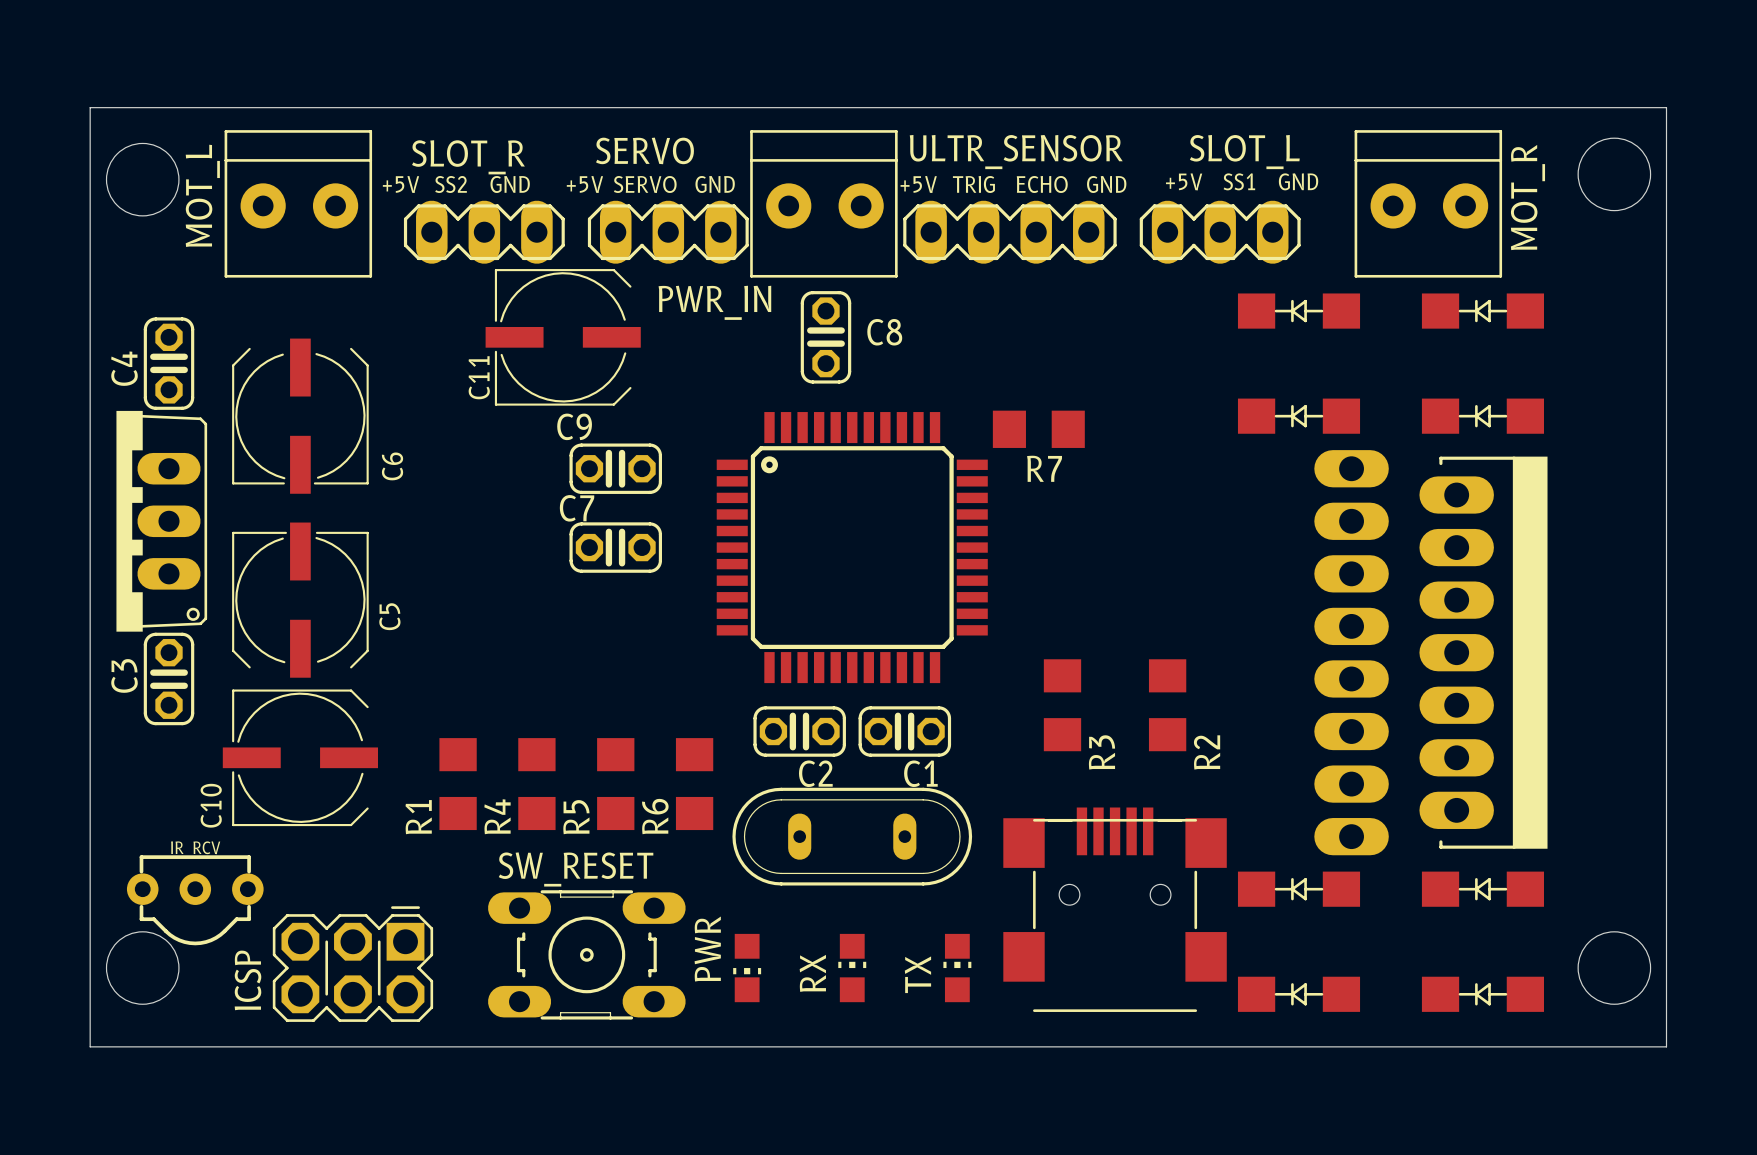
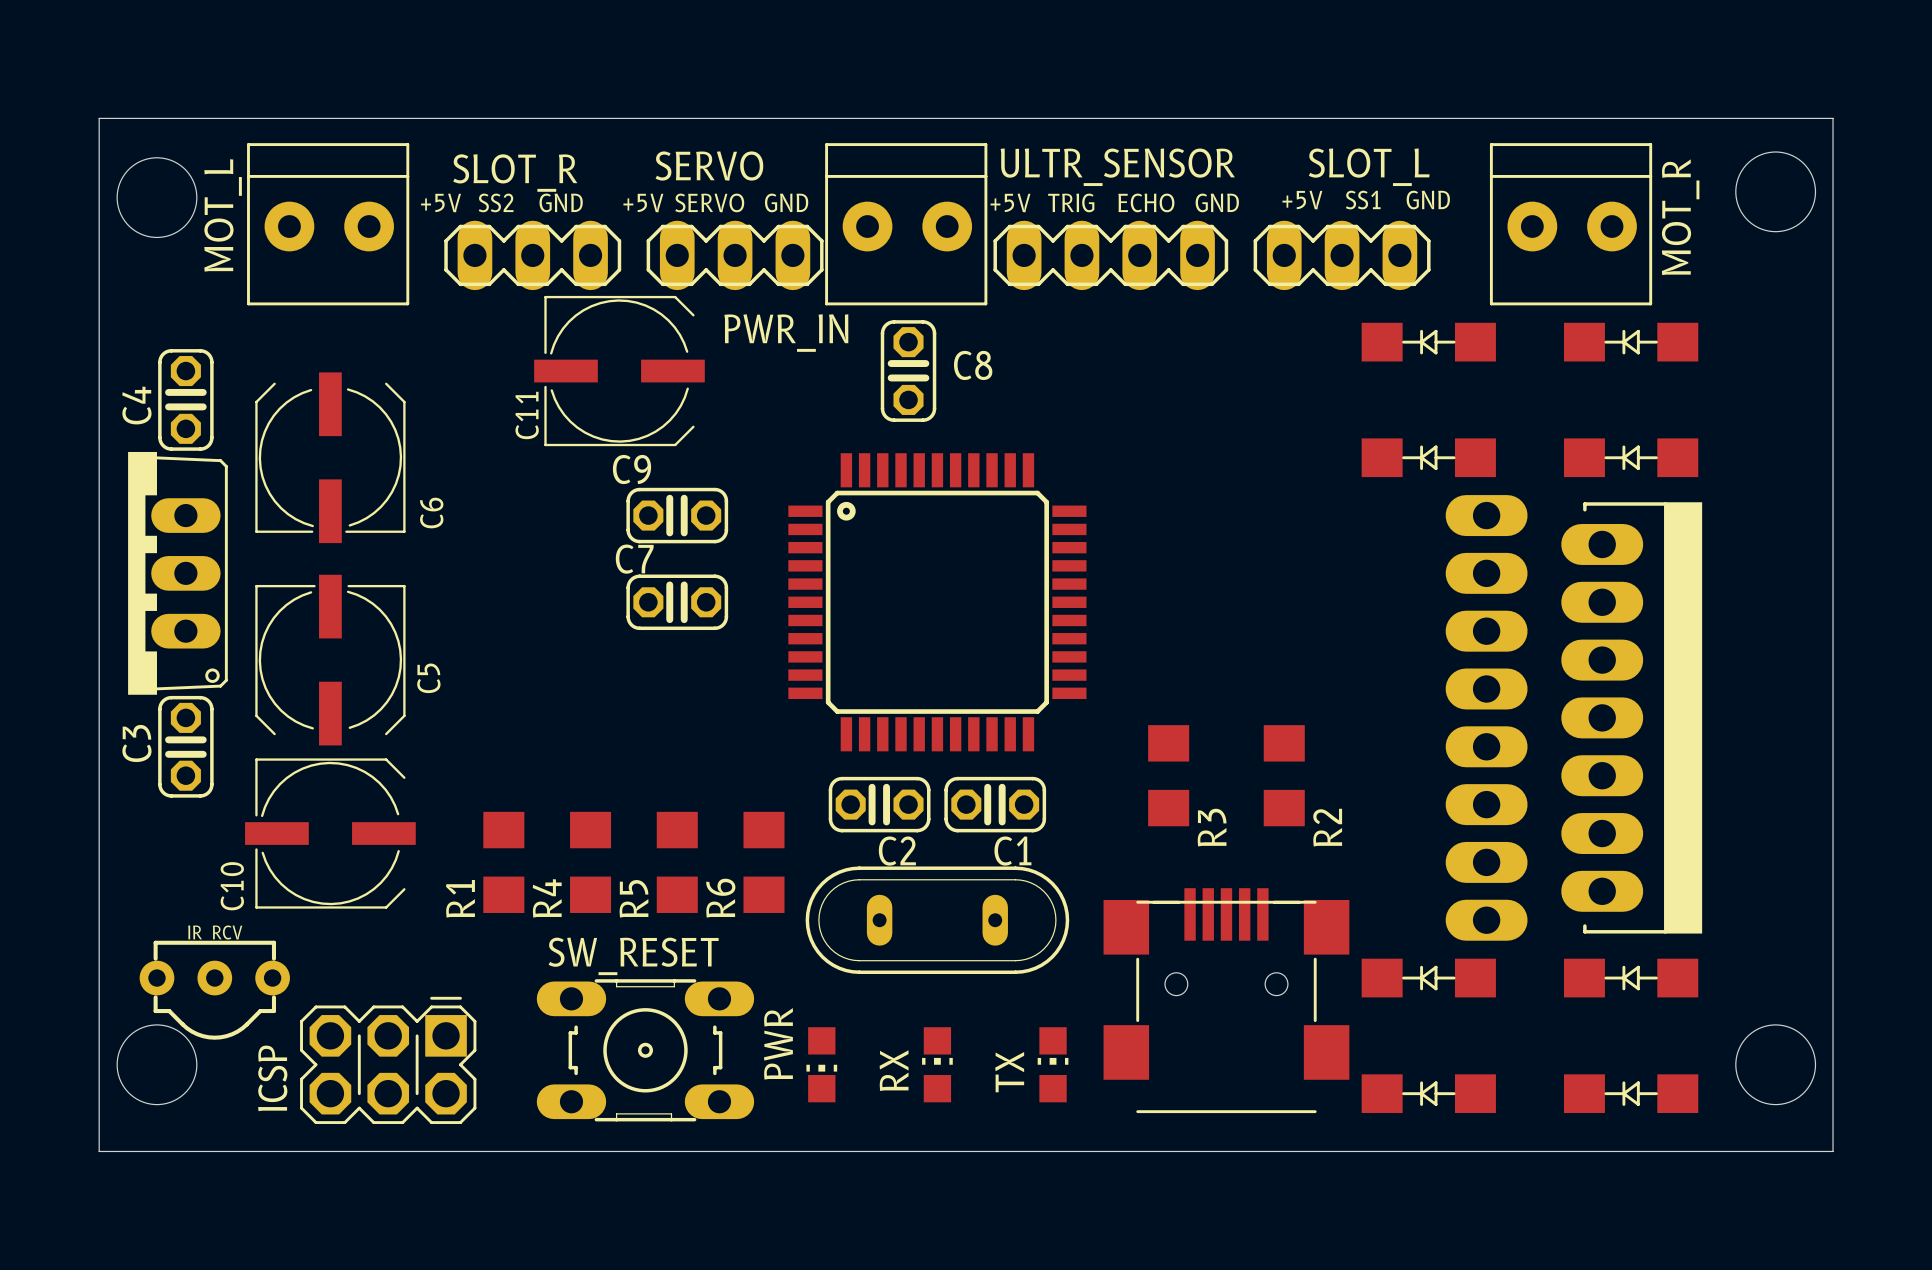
R7: (1038, 429) -> none

